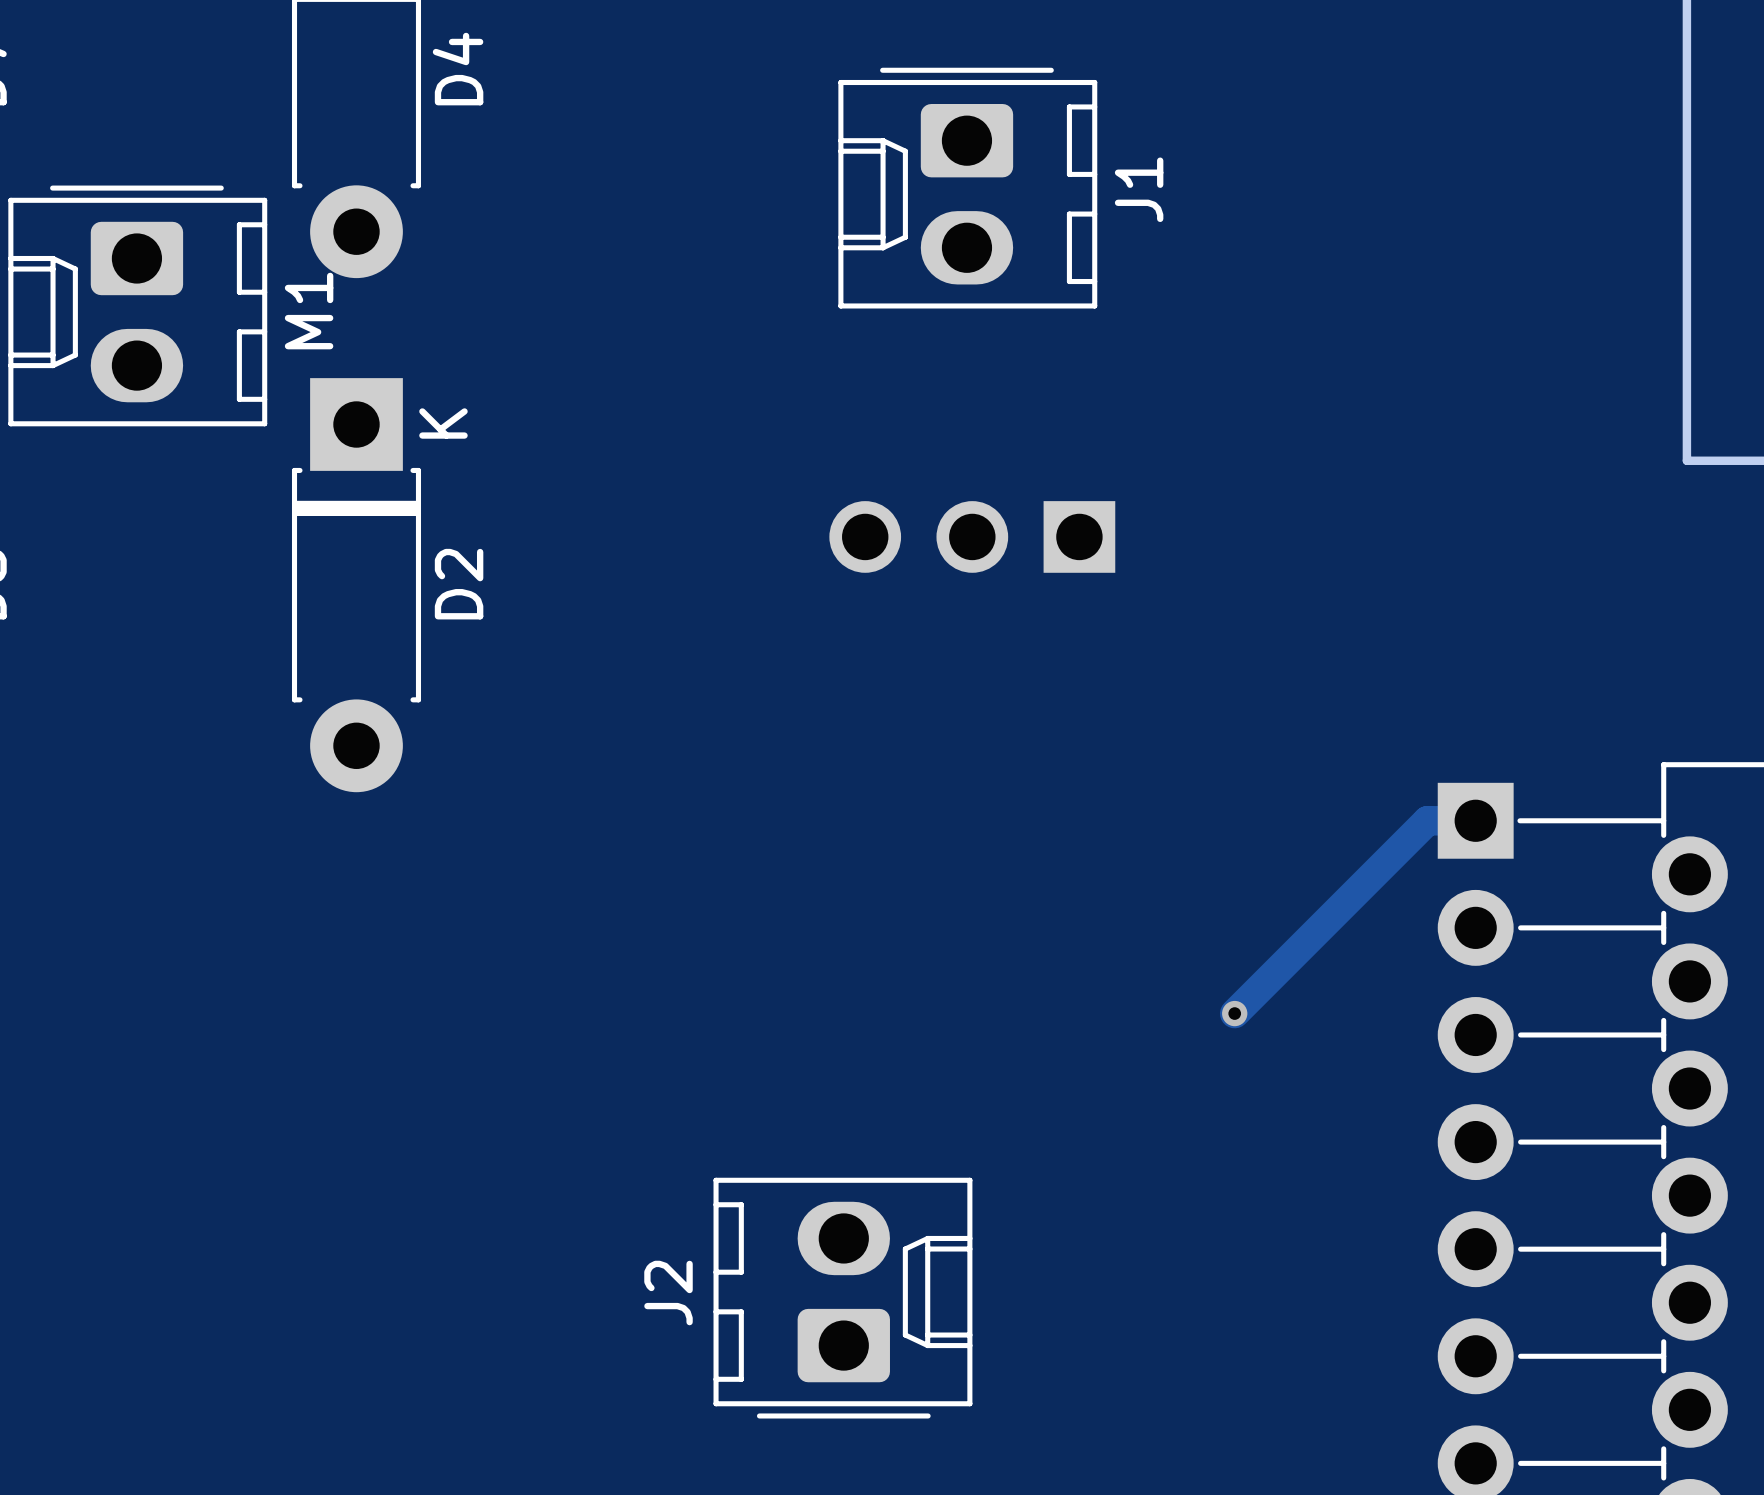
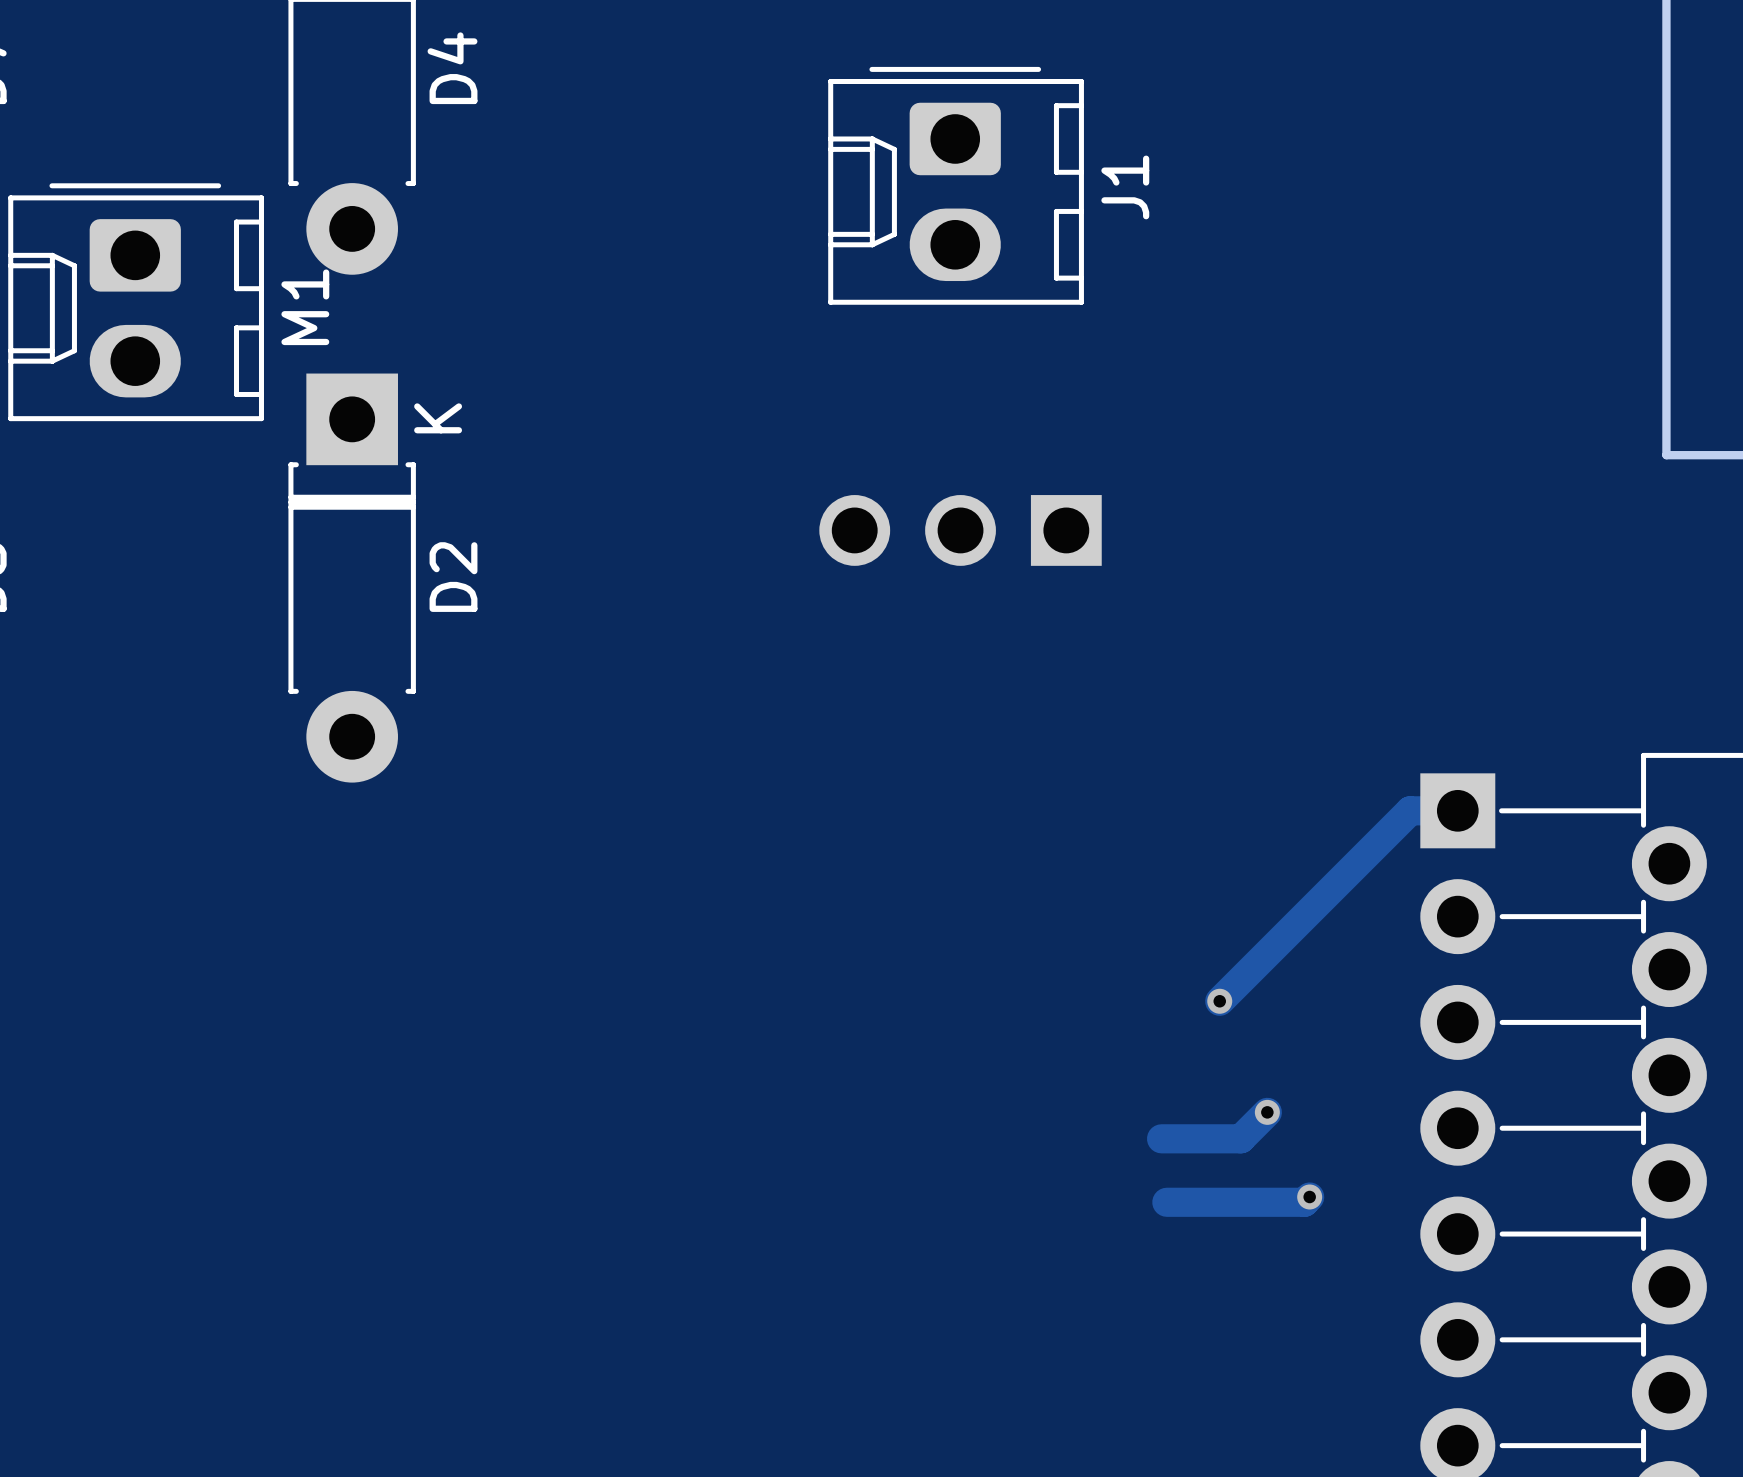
track: none -> (1267, 1112) (1240, 1138) (1161, 1138)
via: none -> (1267, 1112)
track: none -> (1309, 1197) (1304, 1202) (1166, 1202)
via: none -> (1309, 1197)
J2: (842, 1298) -> none

